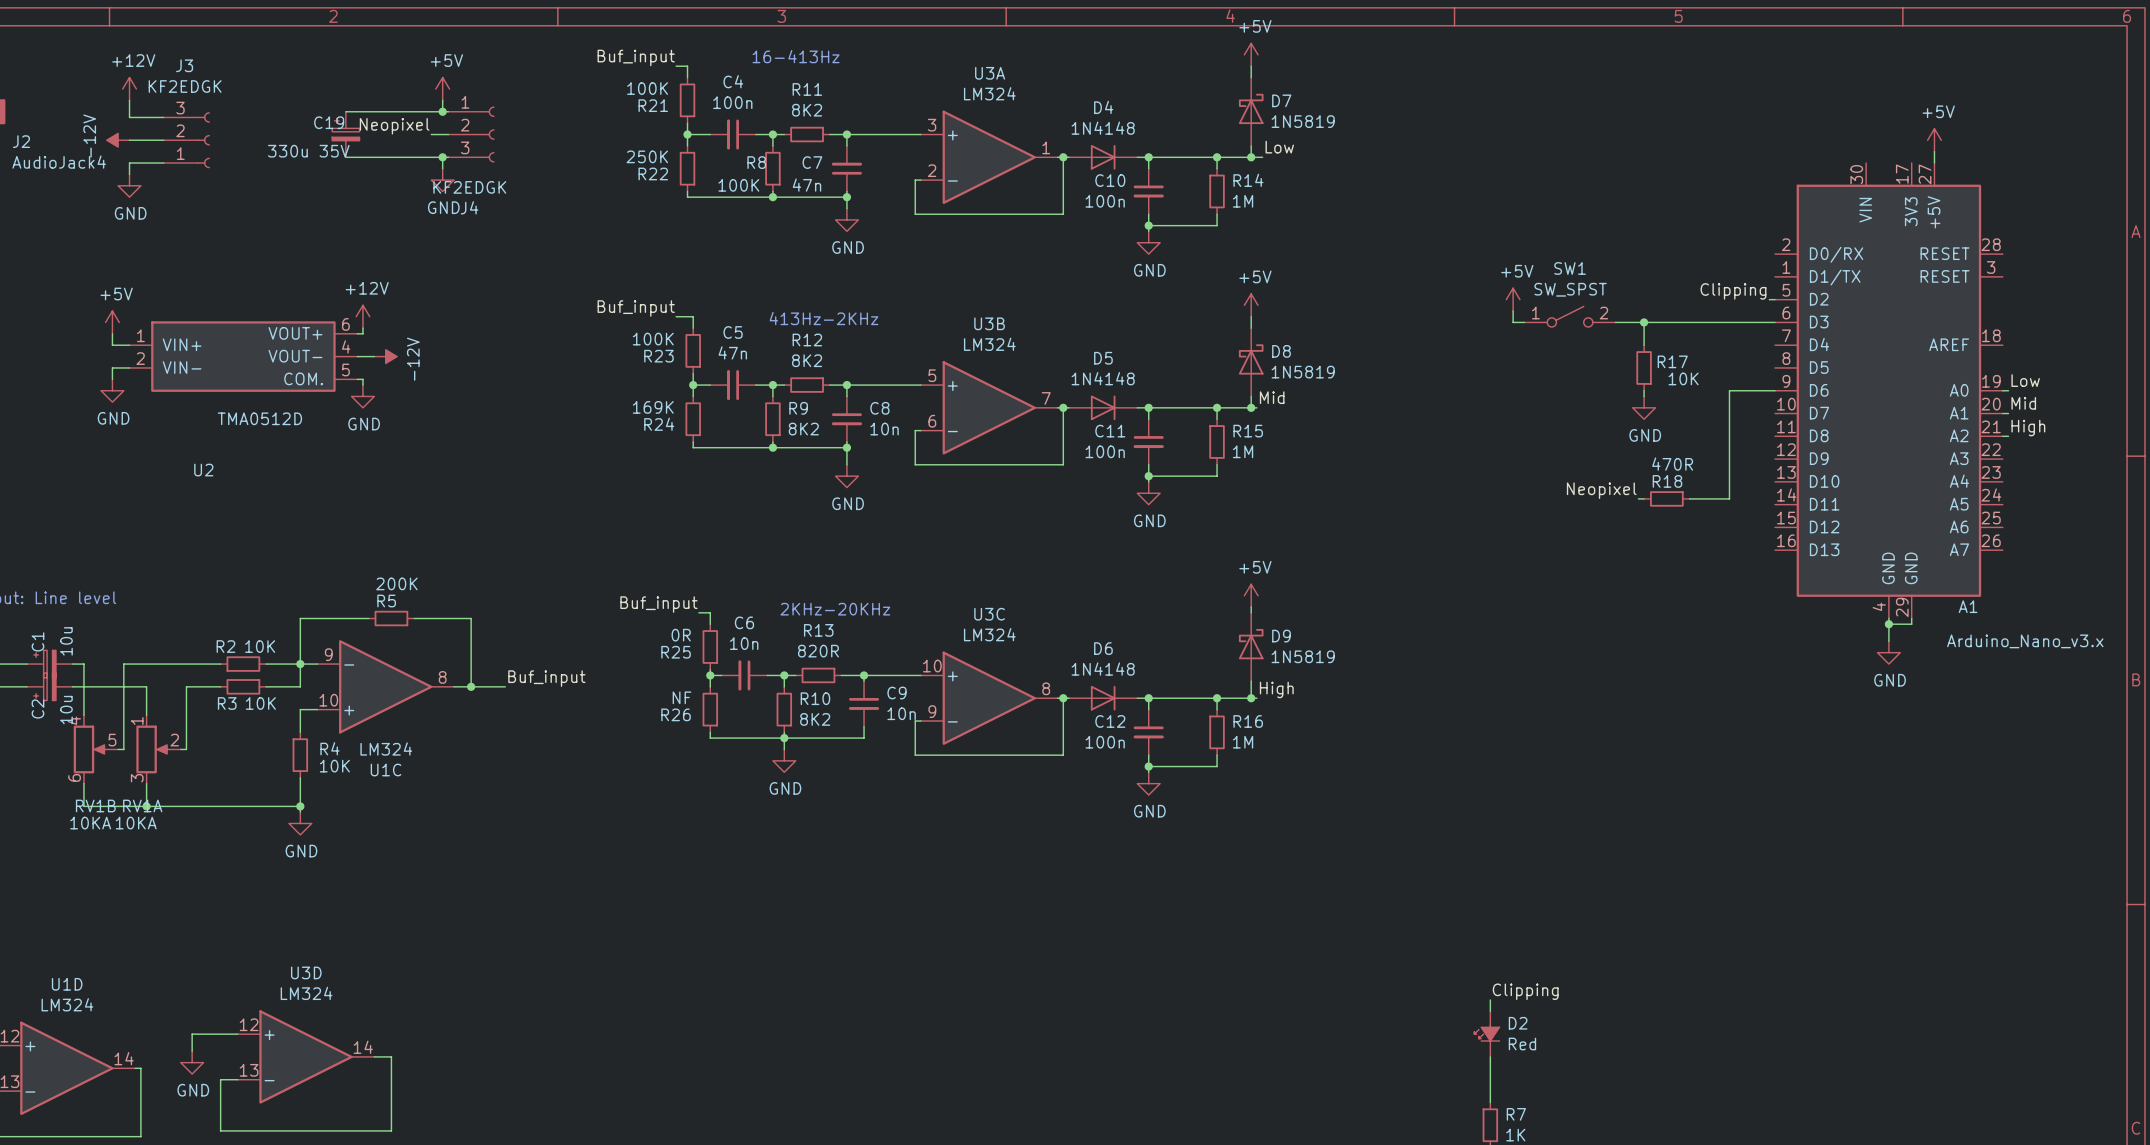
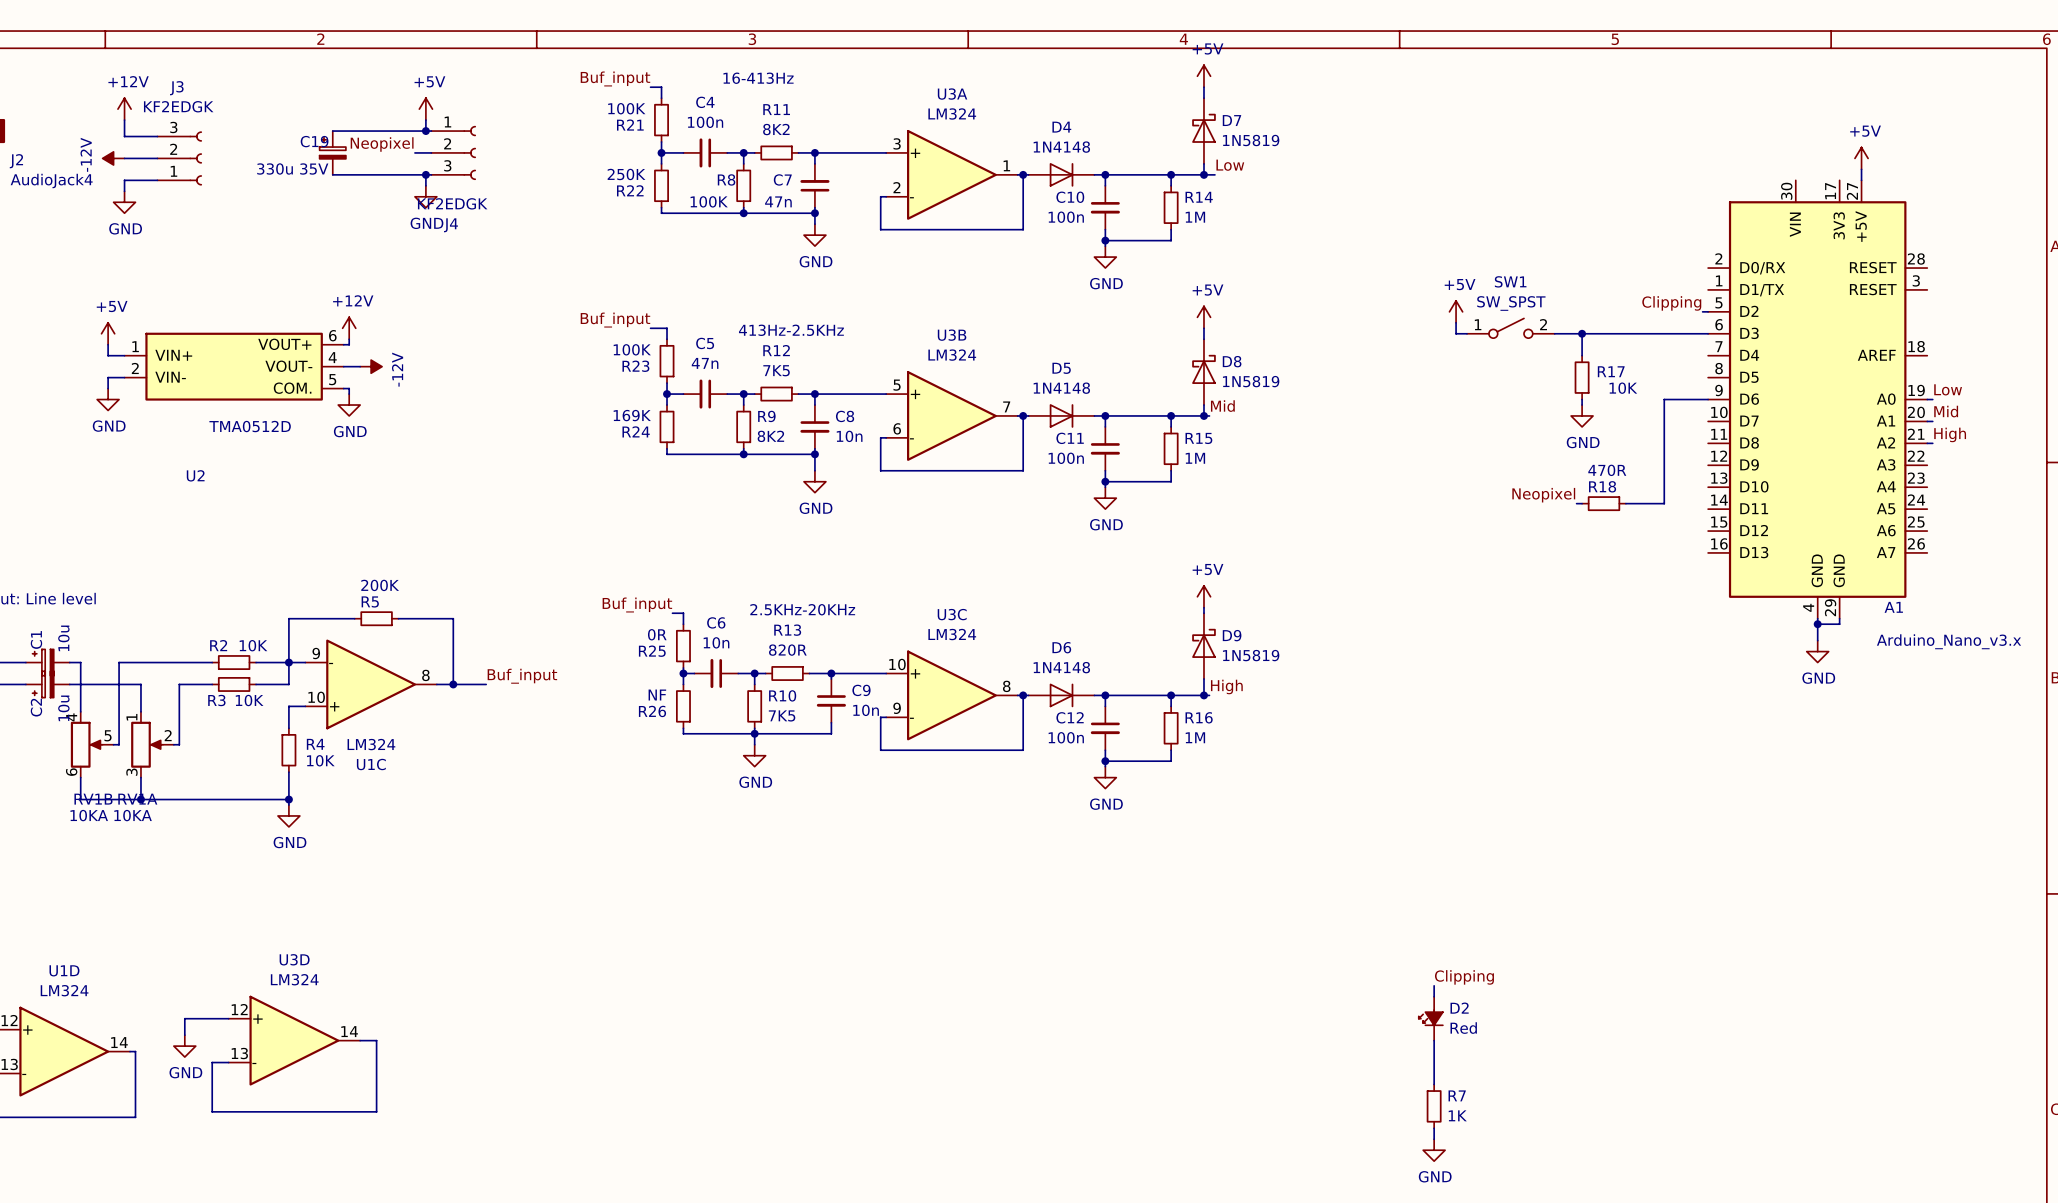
text: 413Hz-2KHz (823, 318) -> 413Hz-2.5KHz (791, 330)
R12 value: 8K2 (807, 360) -> 7K5 (776, 370)
text: 2KHz-20KHz (835, 609) -> 2.5KHz-20KHz (802, 609)
R10 value: 8K2 (815, 719) -> 7K5 (782, 715)

